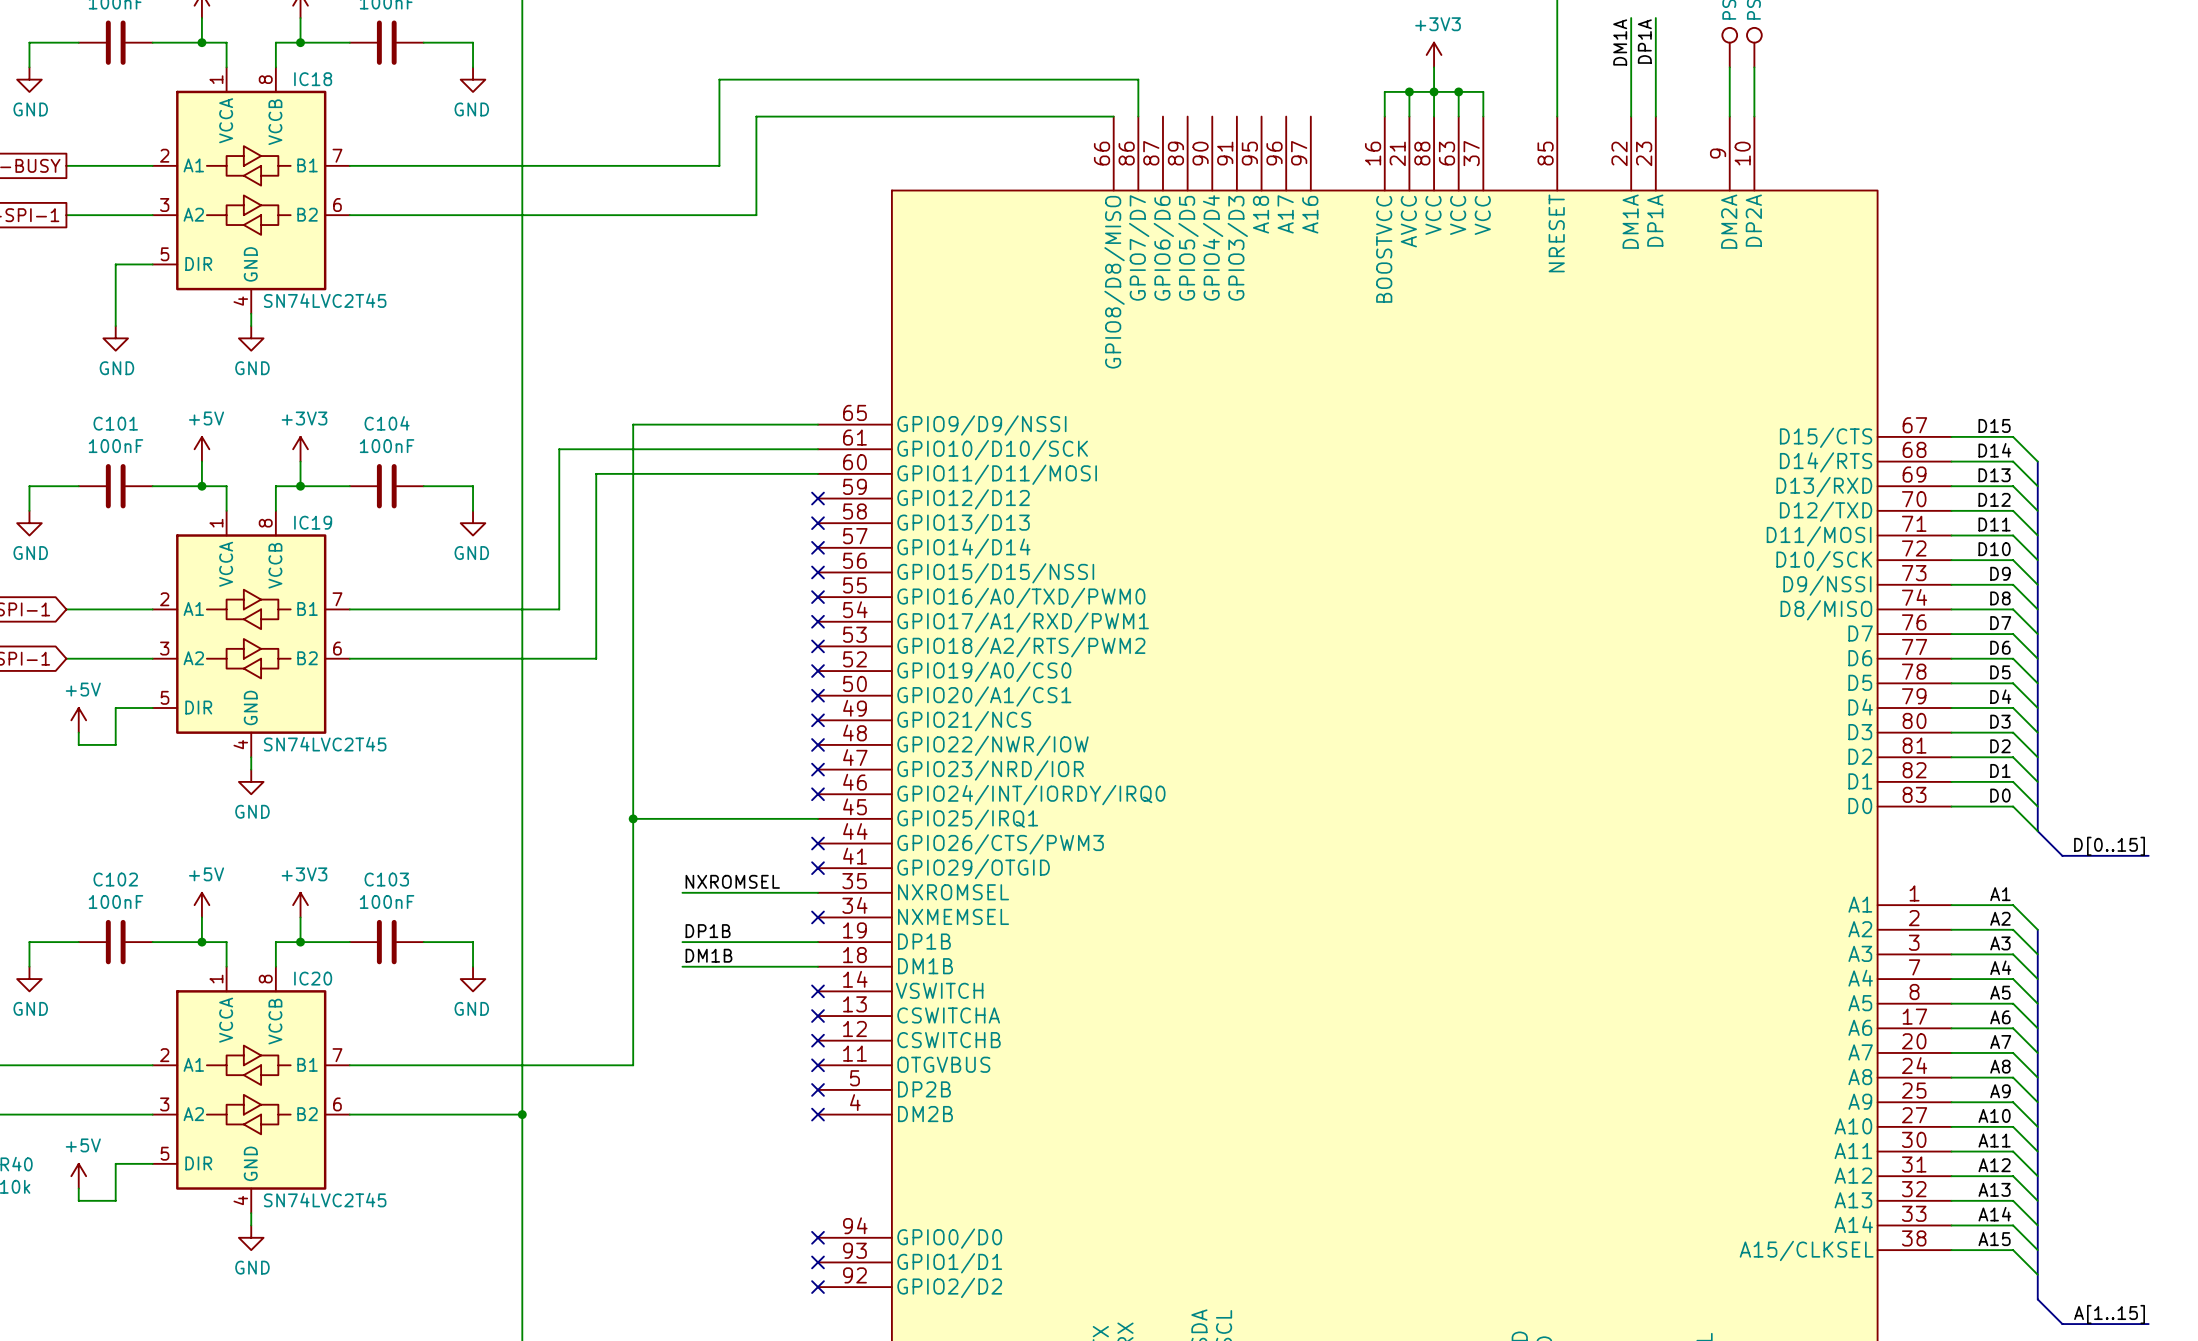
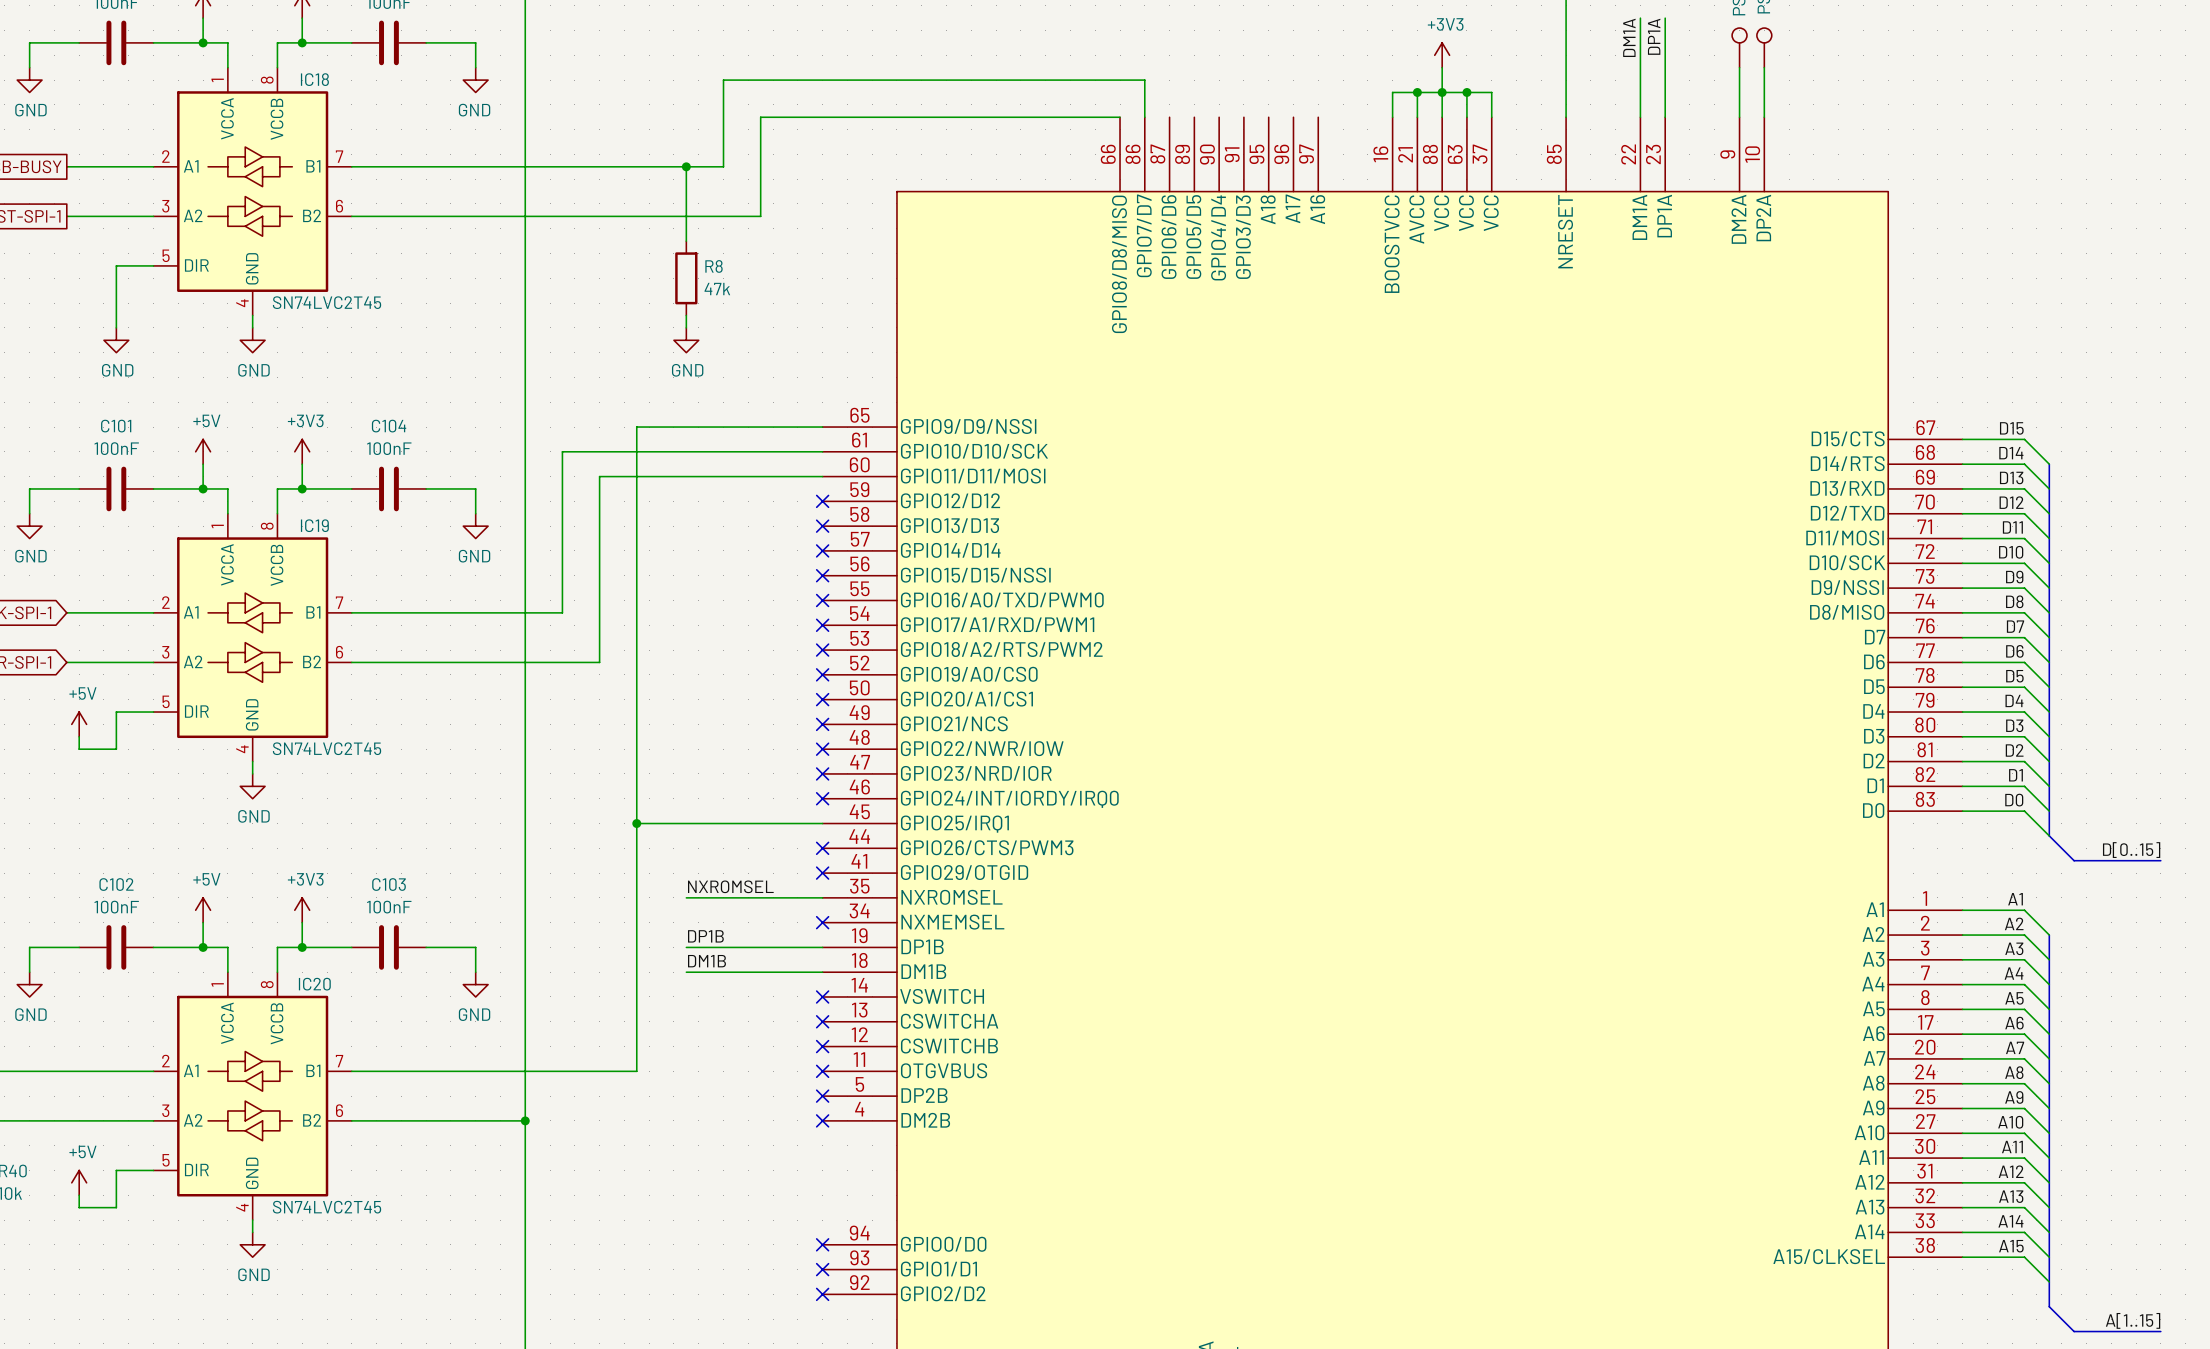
wire: none -> (686, 166) (686, 241)
junction: none -> (686, 166)
R8: none -> 47k (686, 278)
wire: none -> (686, 315) (686, 327)
power symbol: none -> GND (686, 340)

